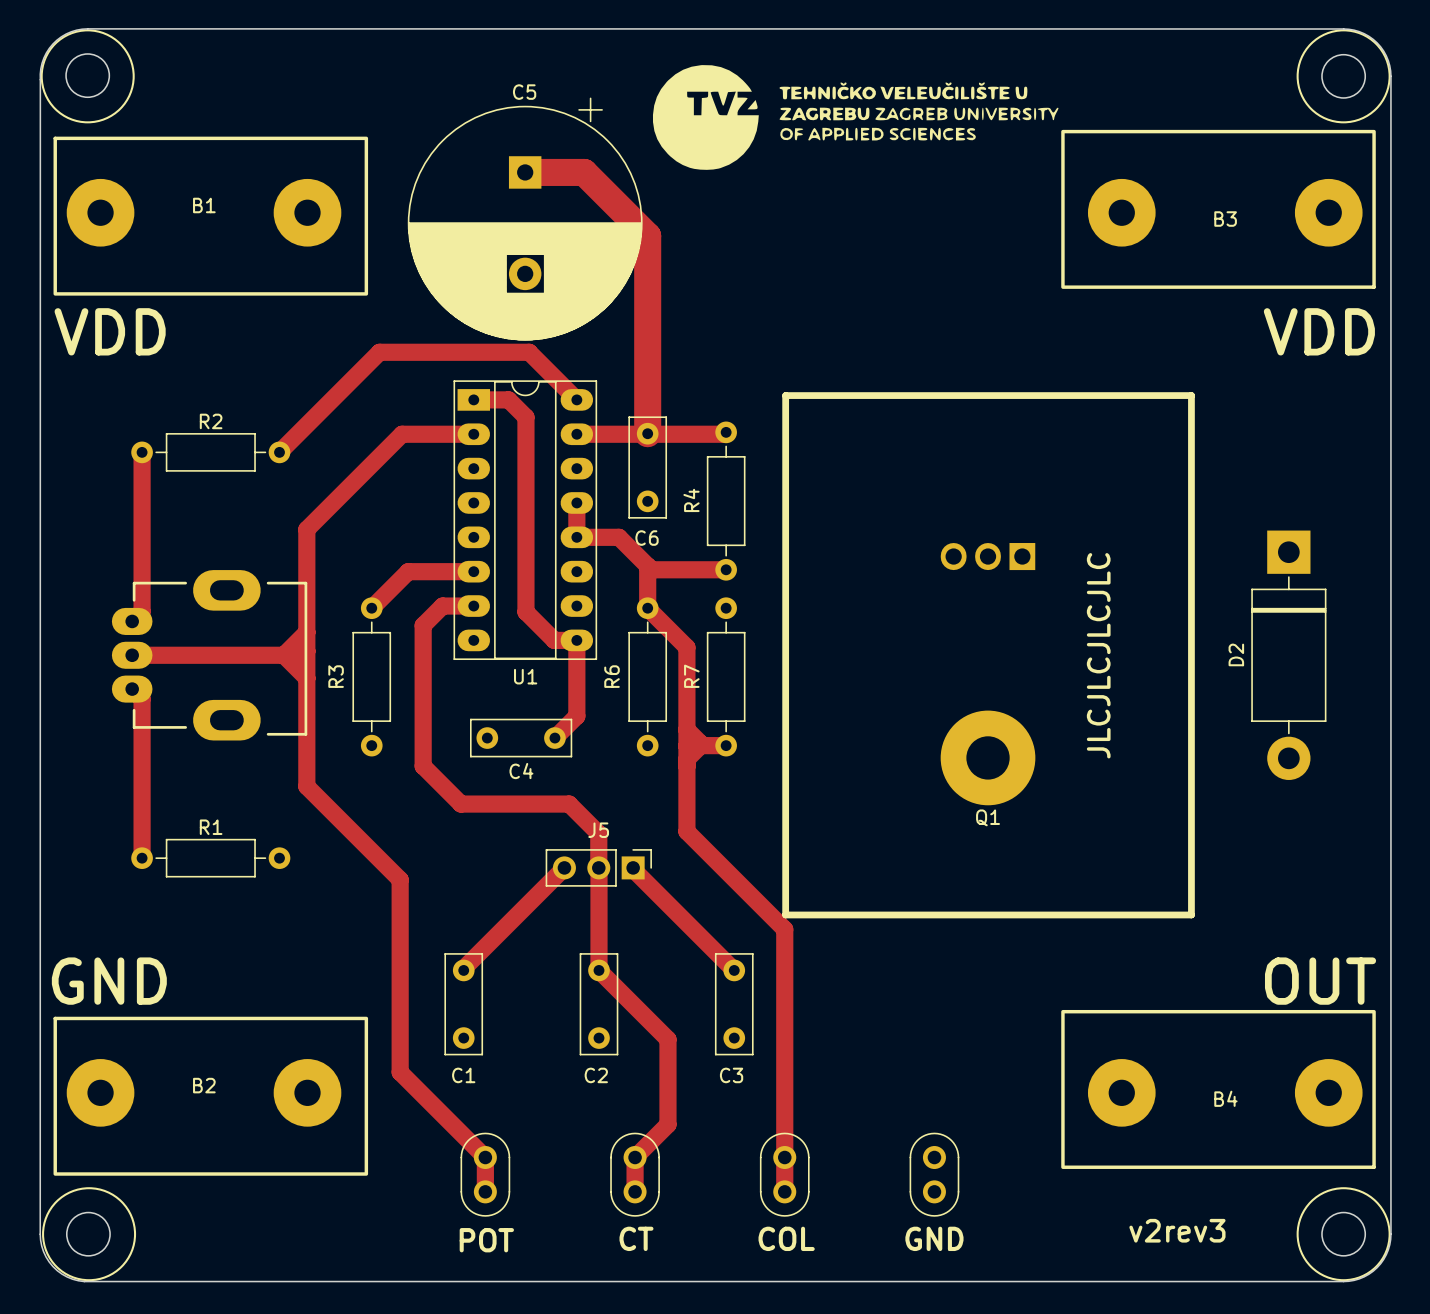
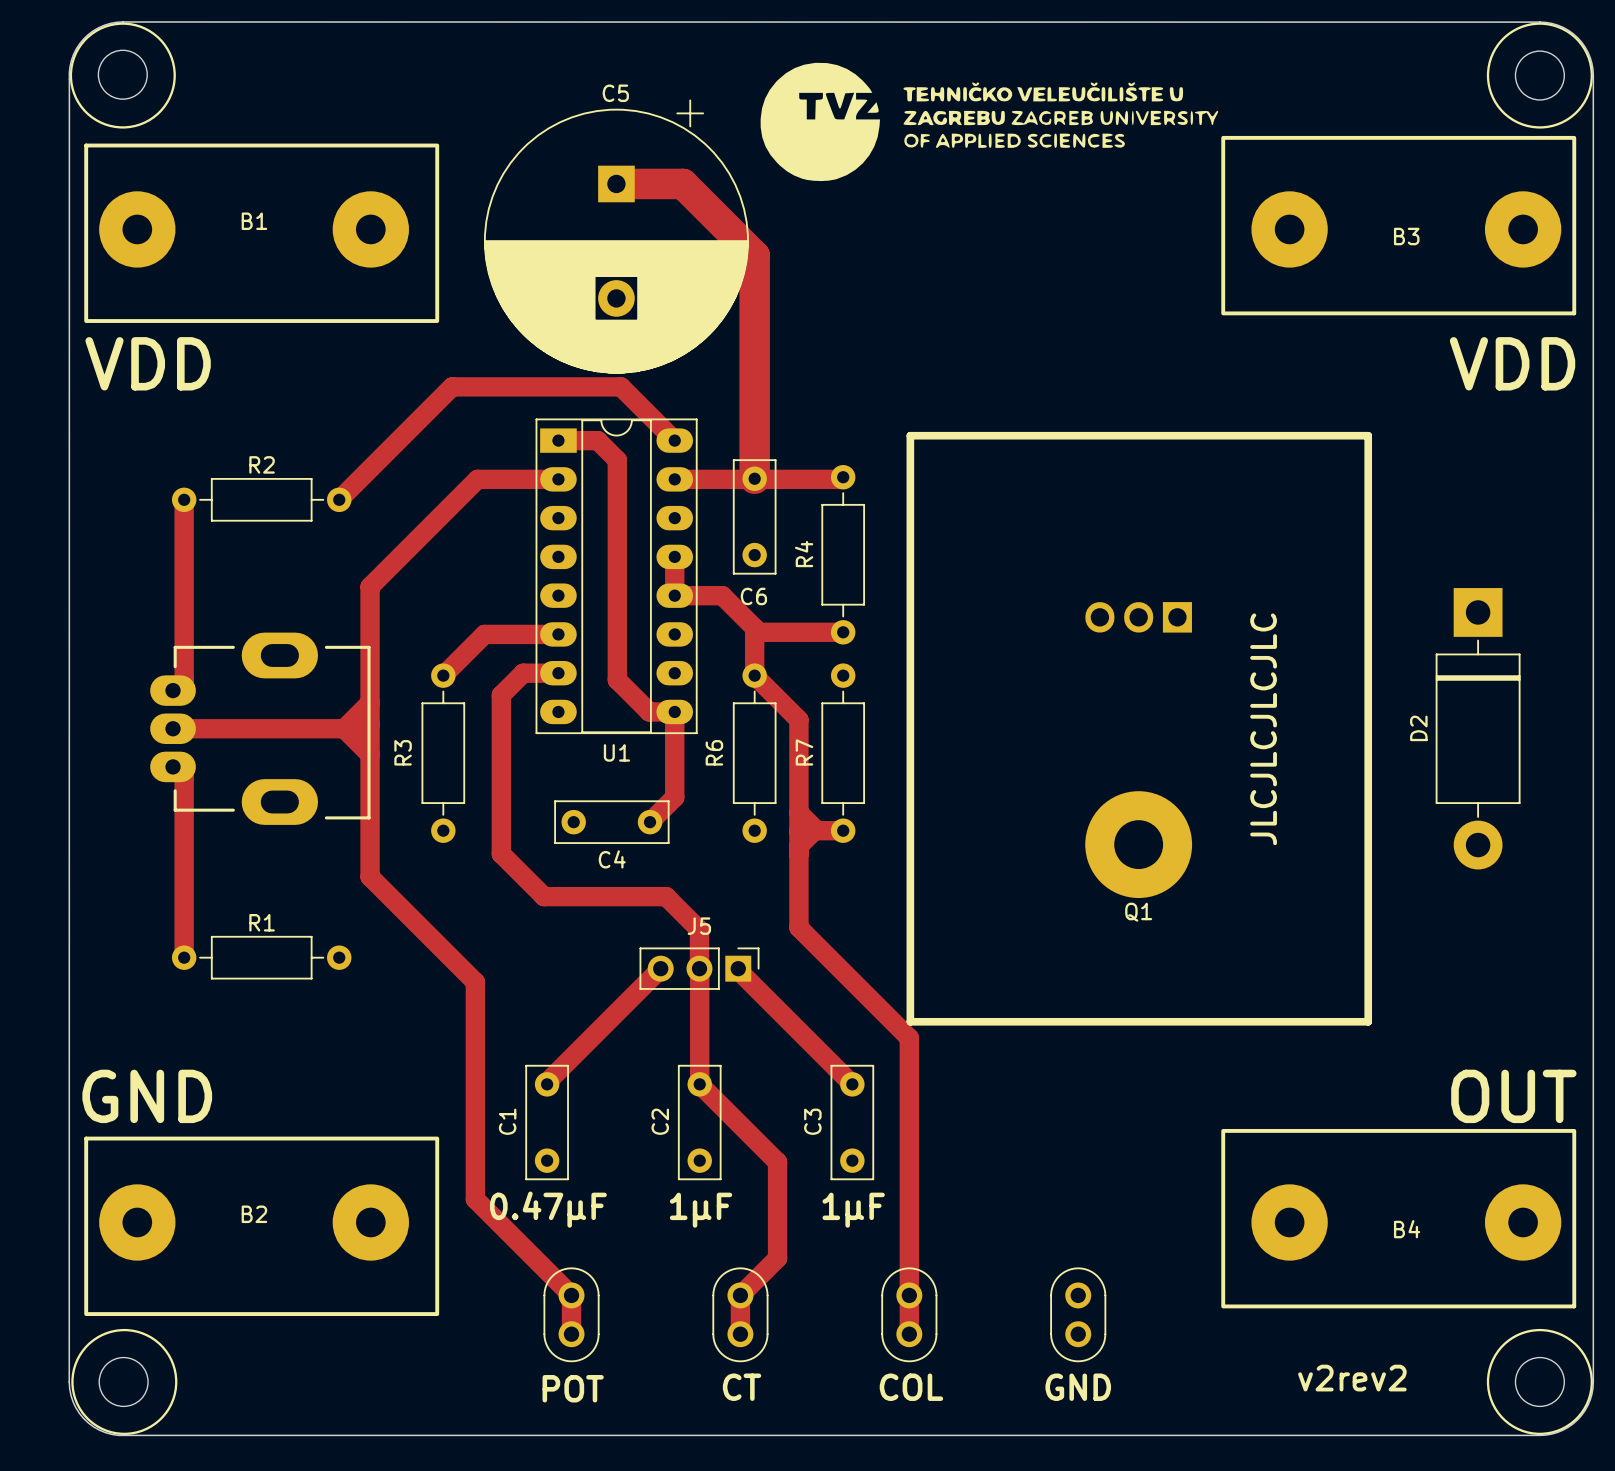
C1 name rotation: 0° (463, 1075) -> 90° counterclockwise (507, 1121)
C1 name position: C1 (463, 1075) -> C1 (507, 1121)
C2 name rotation: 0° (596, 1075) -> 90° counterclockwise (660, 1121)
C2 name position: C2 (596, 1075) -> C2 (660, 1121)
C3 name rotation: 0° (731, 1075) -> 90° counterclockwise (812, 1121)
C3 name position: C3 (731, 1075) -> C3 (812, 1121)
text: none -> 0.47μF (548, 1209)
text: none -> 1μF (701, 1210)
text: none -> 1μF (853, 1210)
text: v2rev3 (1177, 1230) -> v2rev2 (1352, 1378)

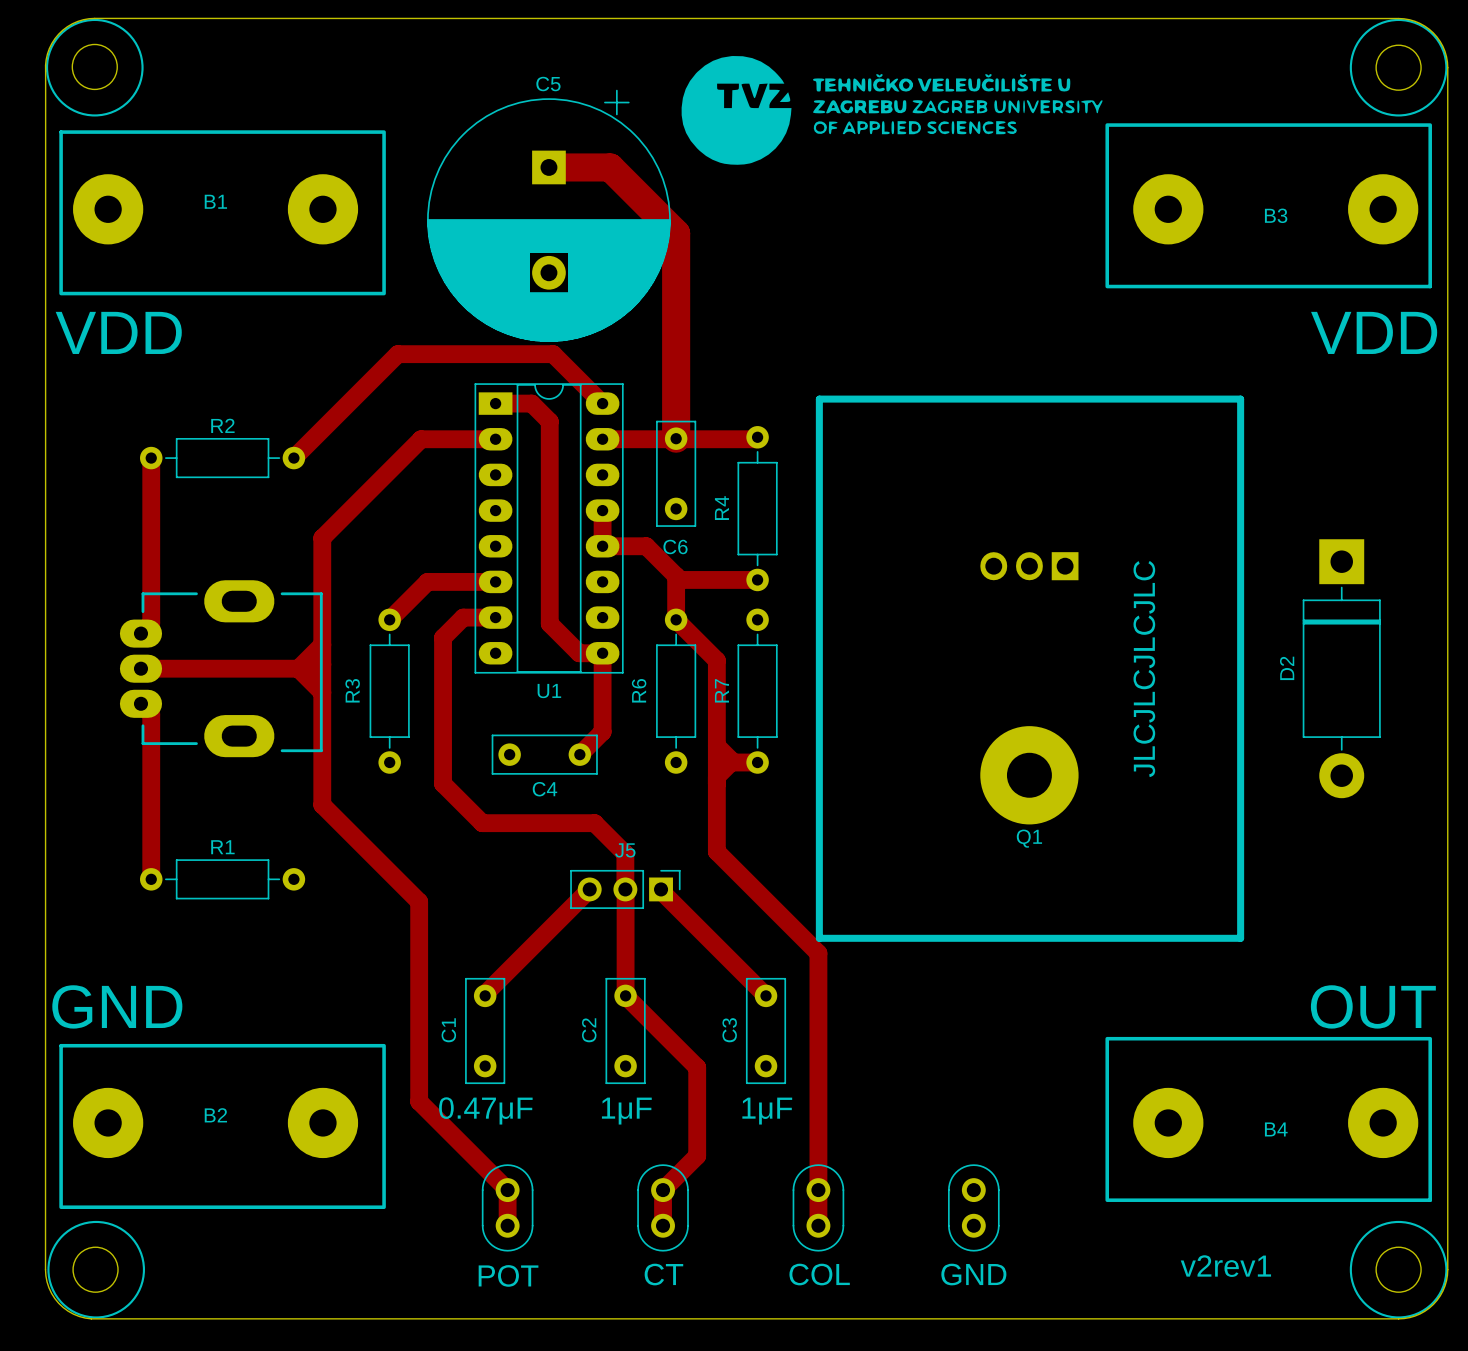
text: v2rev2 (1352, 1378) -> v2rev1 (1225, 1266)

